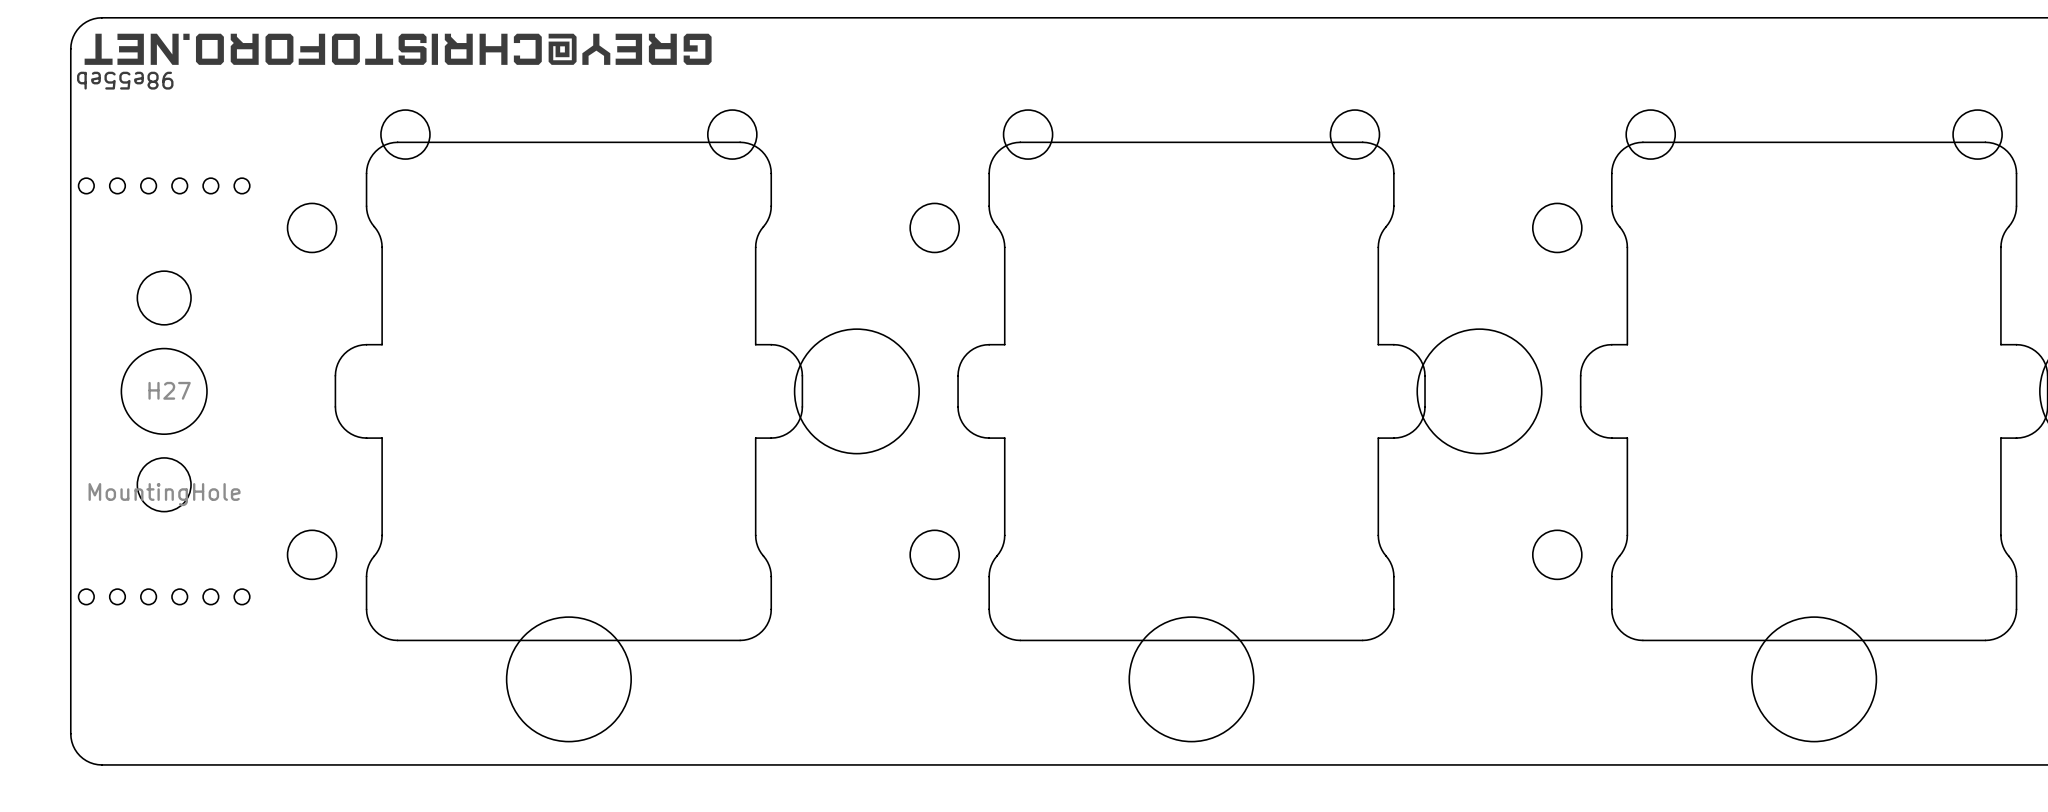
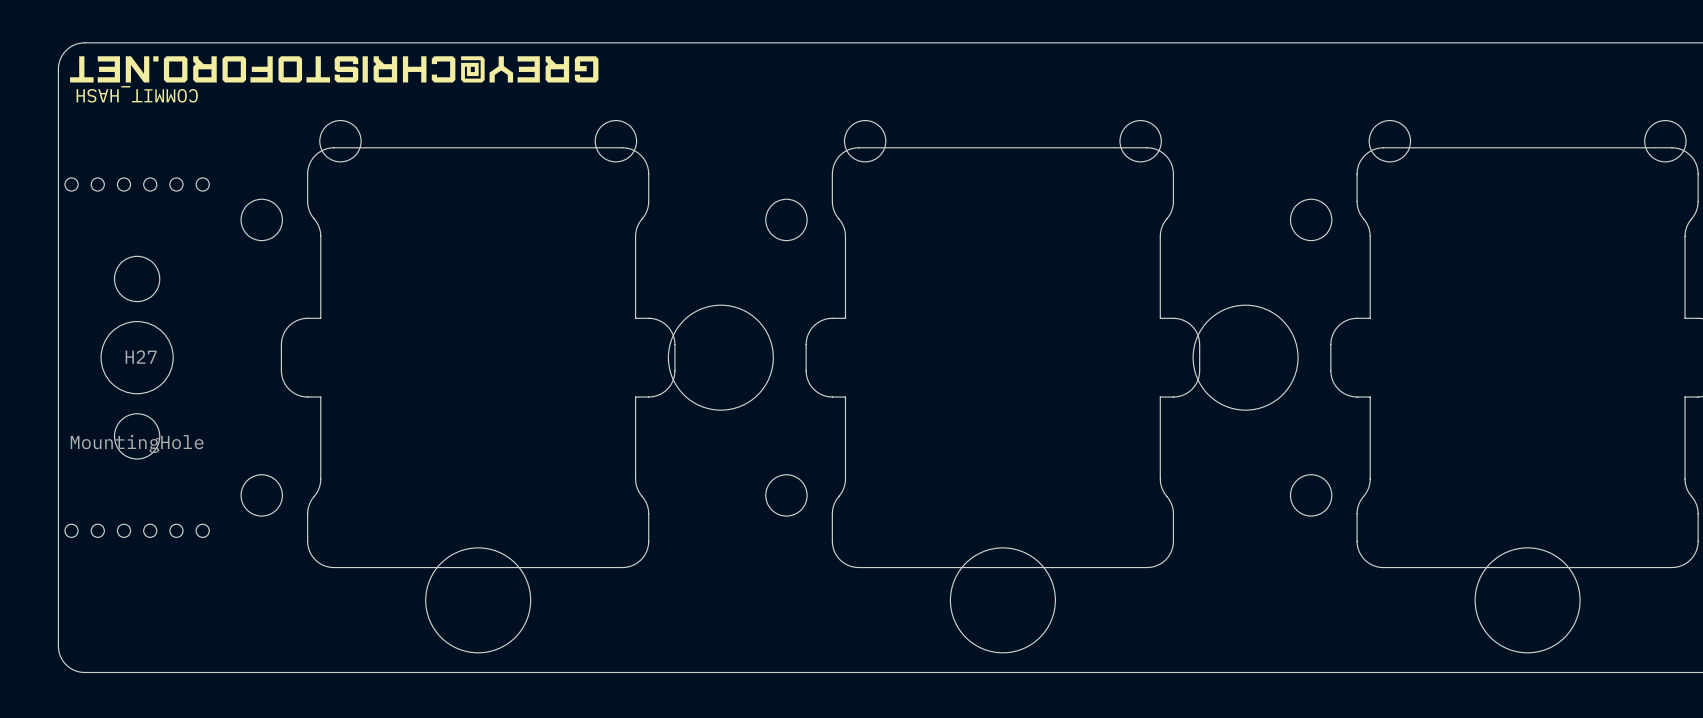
text: none -> COMMIT_HASH (137, 94)
text: 98e55eb (125, 80) -> none

